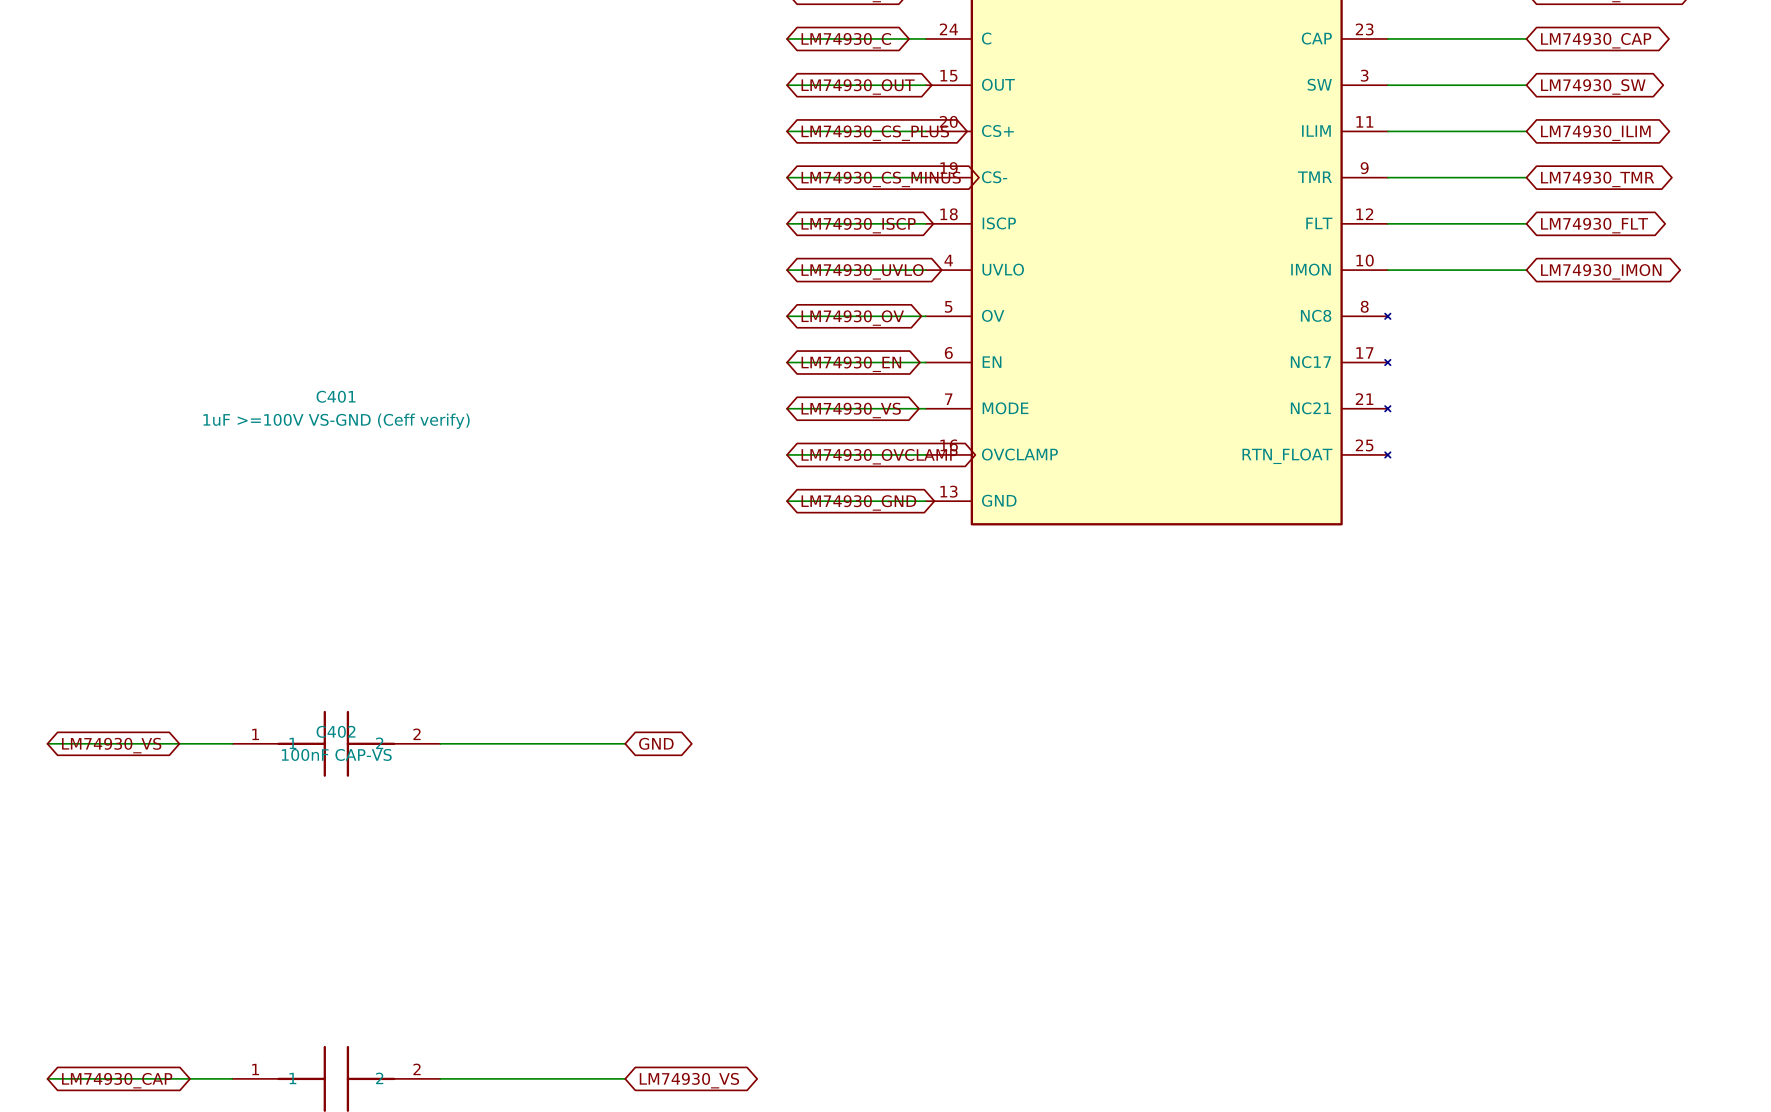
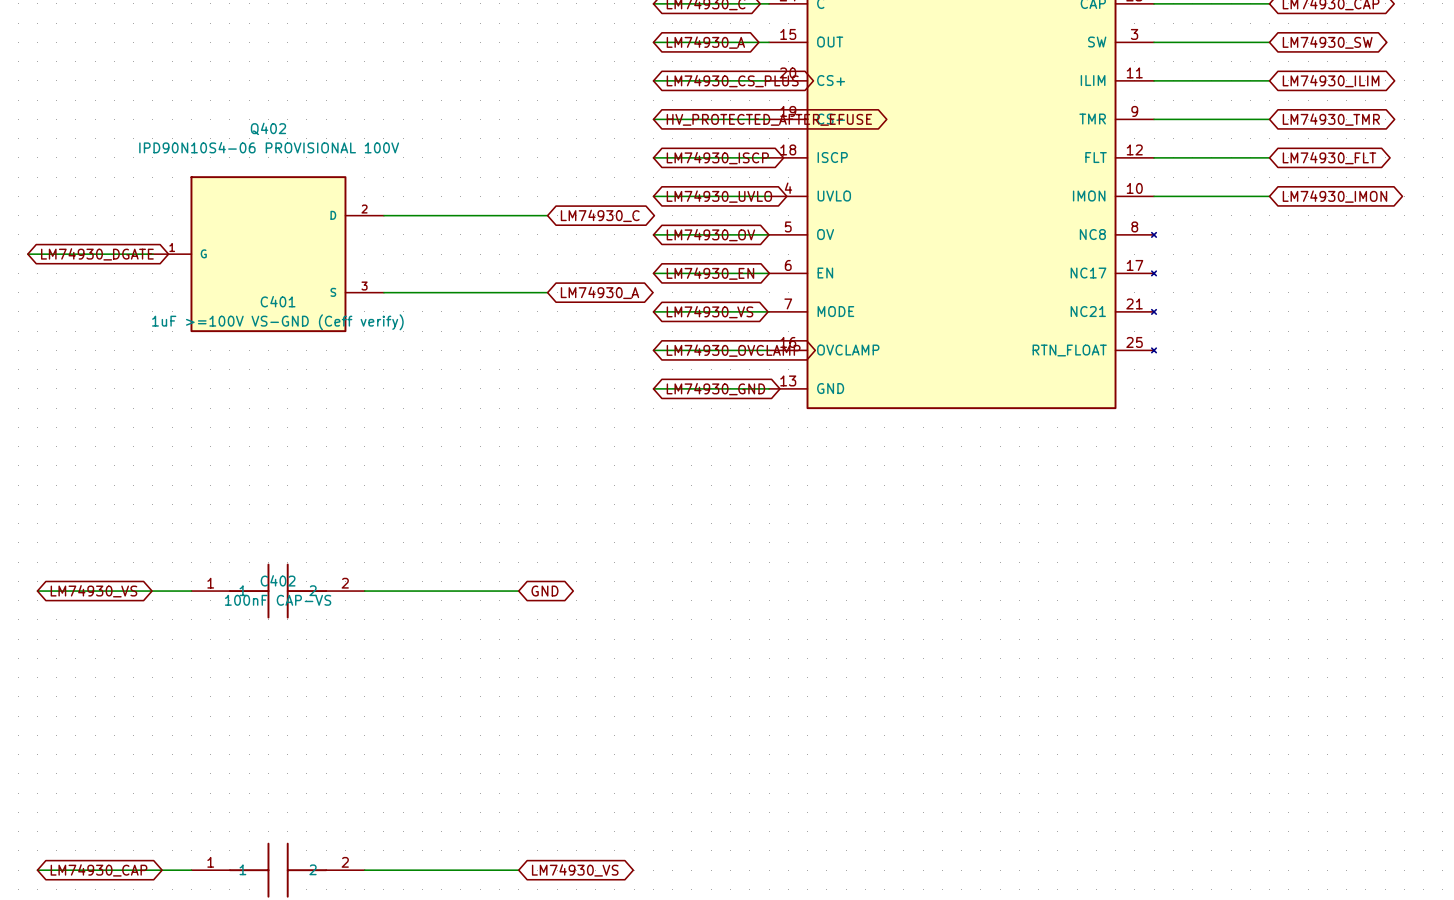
global label: LM74930_OUT (858, 86) -> LM74930_A (705, 42)
global label: LM74930_CS_MINUS (881, 179) -> HV_PROTECTED_AFTER_EFUSE (769, 119)
wire: none -> (383, 215) (547, 215)
global label: none -> LM74930_C (600, 215)
wire: none -> (27, 254) (152, 254)
Q402: none -> IPD90N10S4-06 PROVISIONAL 100V (268, 254)
global label: none -> LM74930_DGATE (97, 254)
wire: none -> (383, 292) (547, 292)
global label: none -> LM74930_A (599, 292)

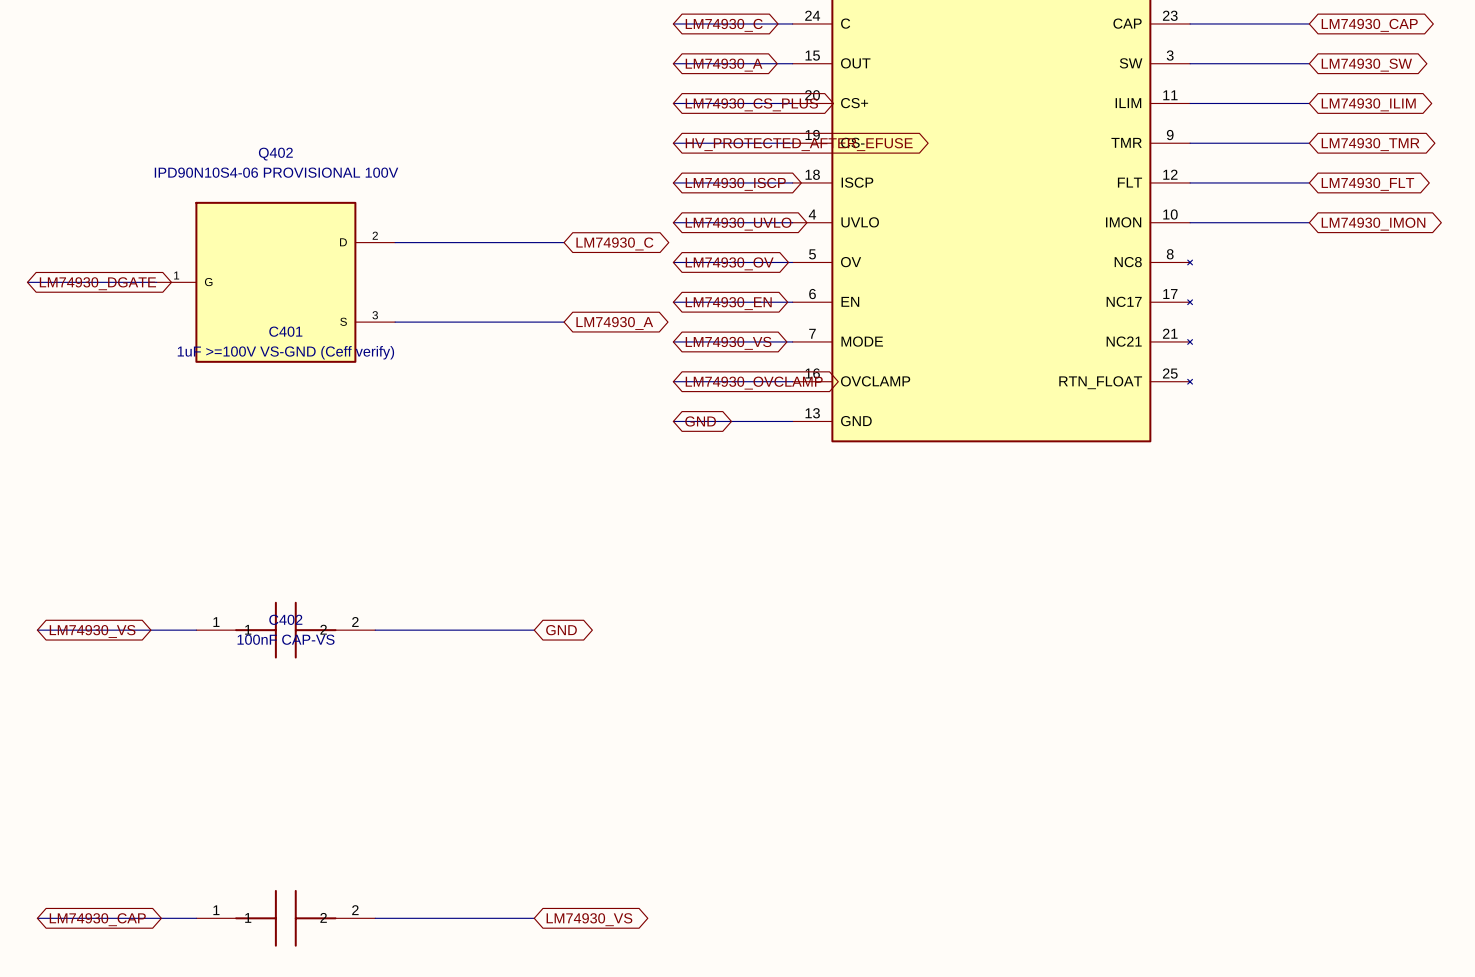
global label: LM74930_GND (715, 389) -> GND (700, 421)

